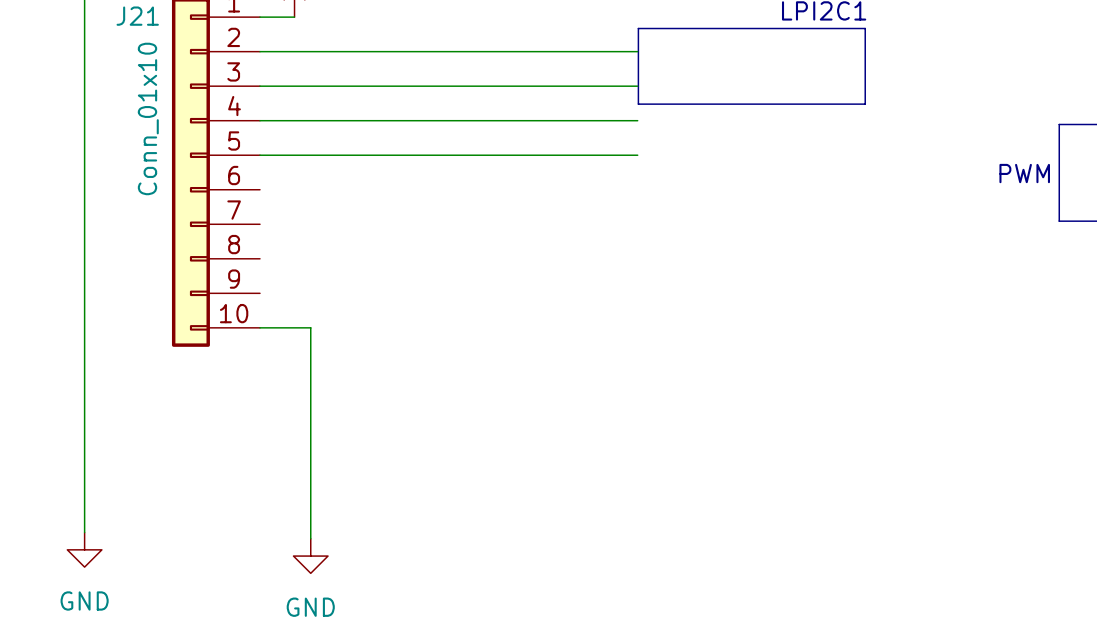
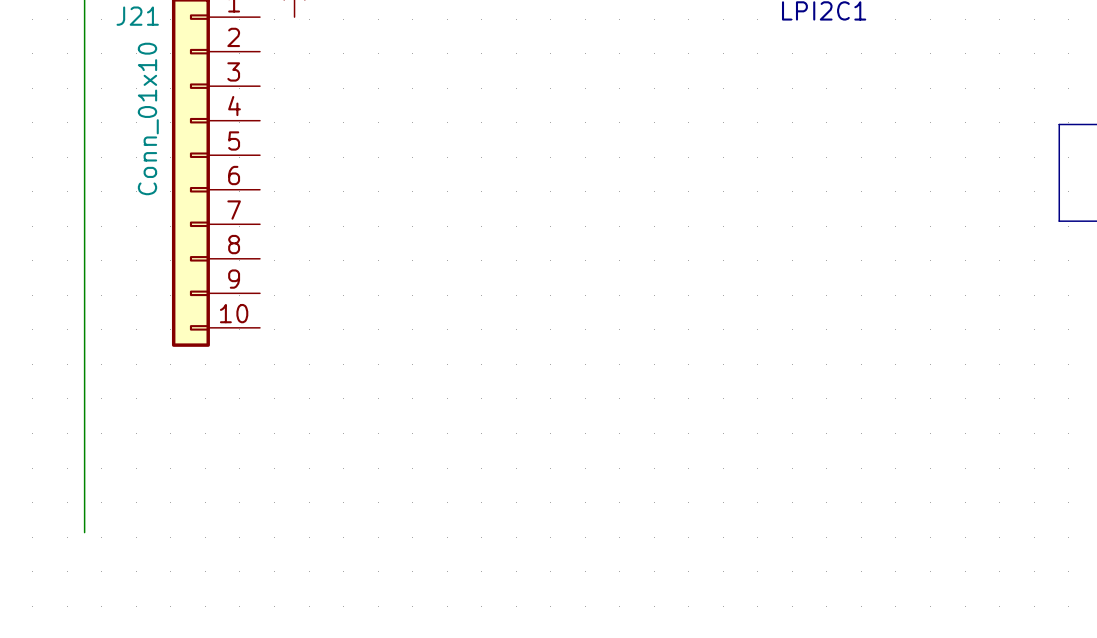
wire: (260, 17) (294, 17) -> none
line: (638, 28) (865, 28) (865, 104) (638, 104) (638, 28) -> none
wire: (260, 51) (637, 51) -> none
wire: (260, 86) (637, 86) -> none
wire: (260, 120) (637, 120) -> none
wire: (260, 155) (637, 155) -> none
text: PWM (1024, 173) -> none
wire: (260, 327) (310, 327) (310, 538) -> none
power symbol: GND (84, 549) -> none
power symbol: GND (310, 556) -> none

